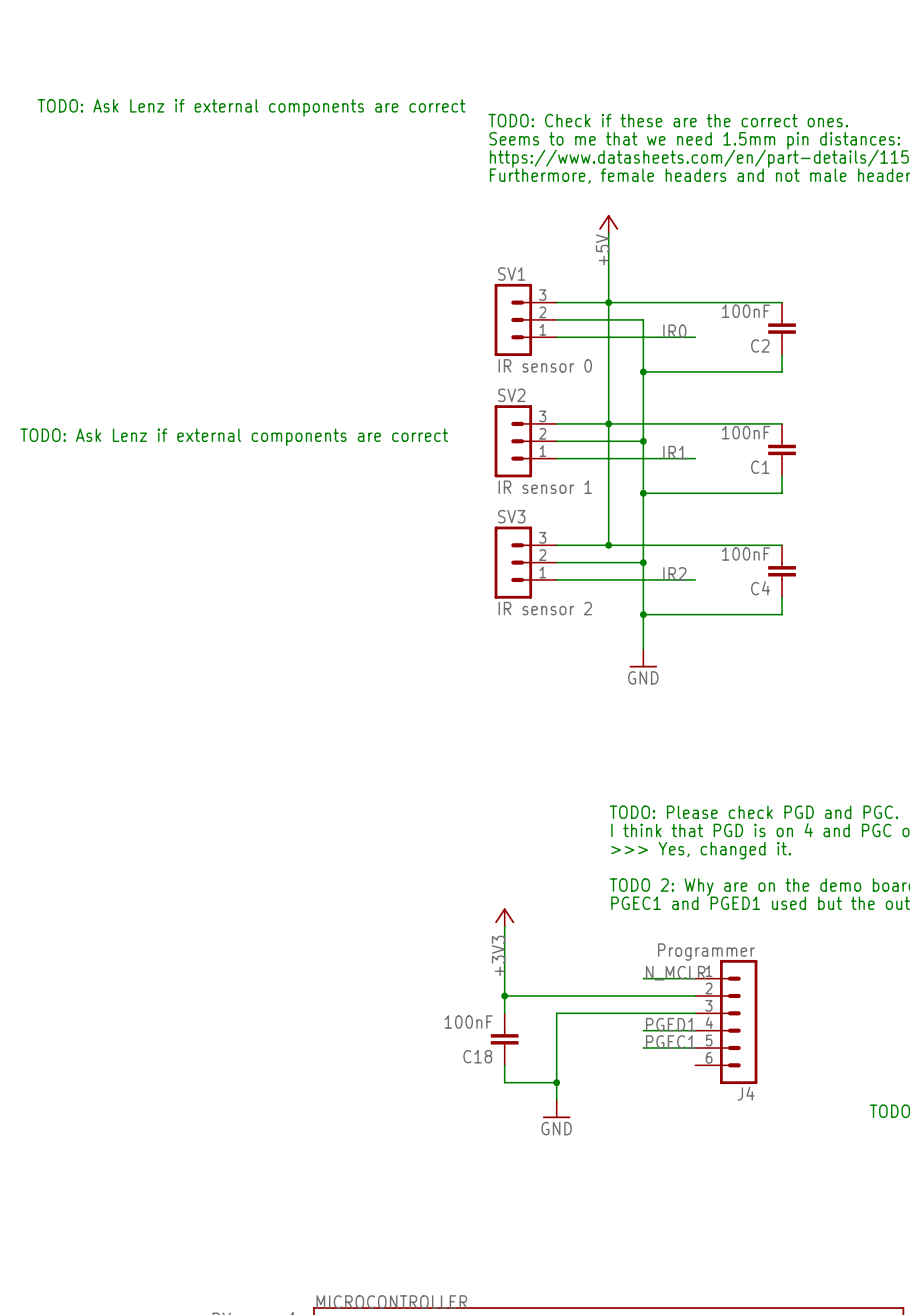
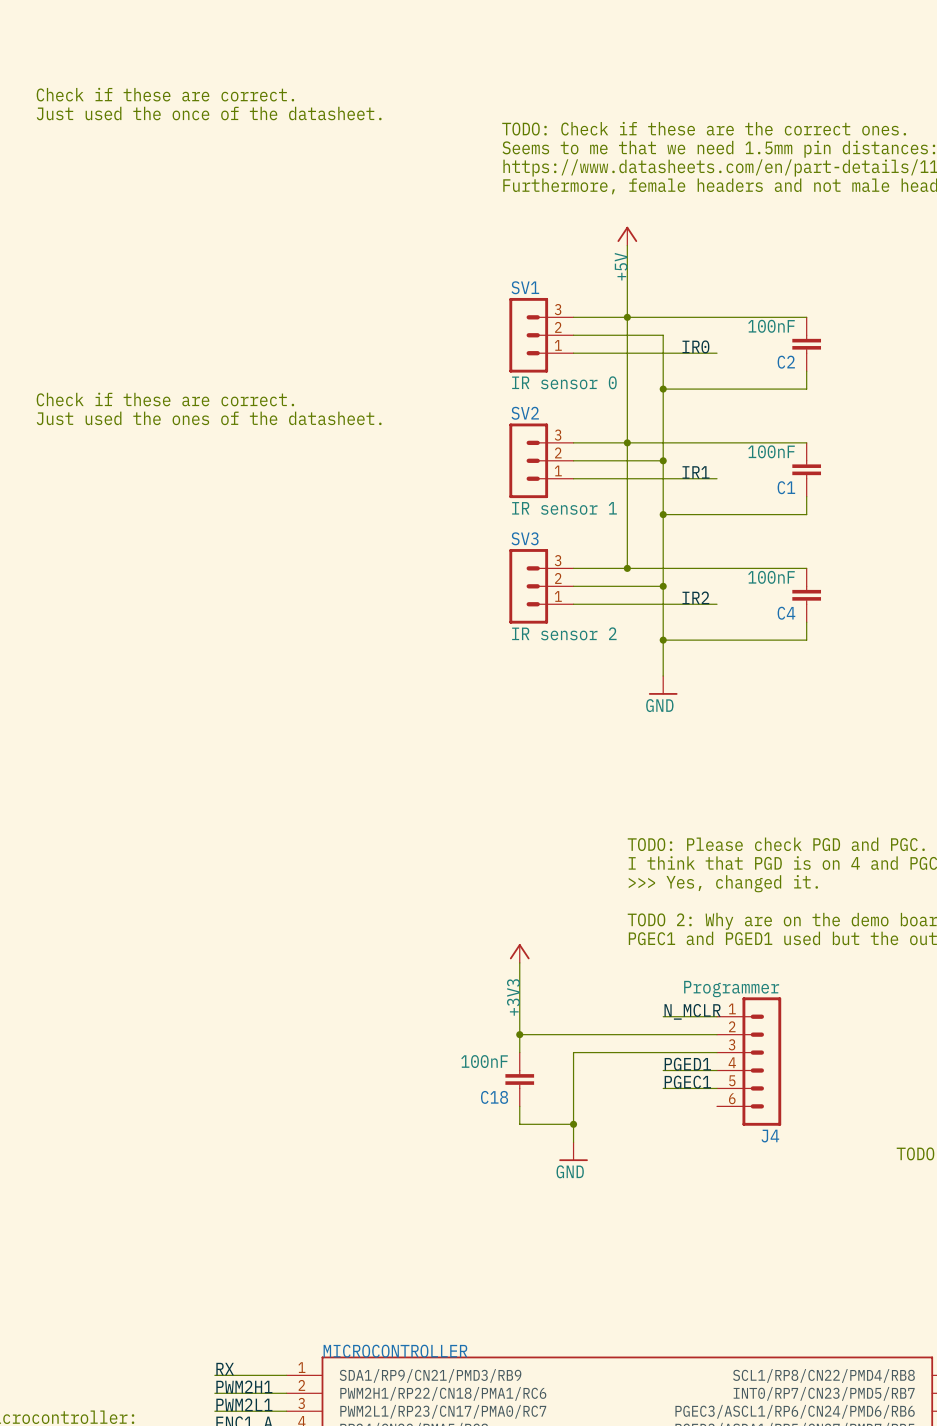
text: none -> Check if these are correct. (165, 94)
text: TODO: Ask Lenz if external components are correct (251, 107) -> Just used the once of the datasheet. (209, 113)
text: none -> Check if these are correct. (165, 399)
text: none -> Just used the ones of the datasheet. (209, 418)
text: TODO: Ask Lenz if external components are correct (234, 437) -> none

